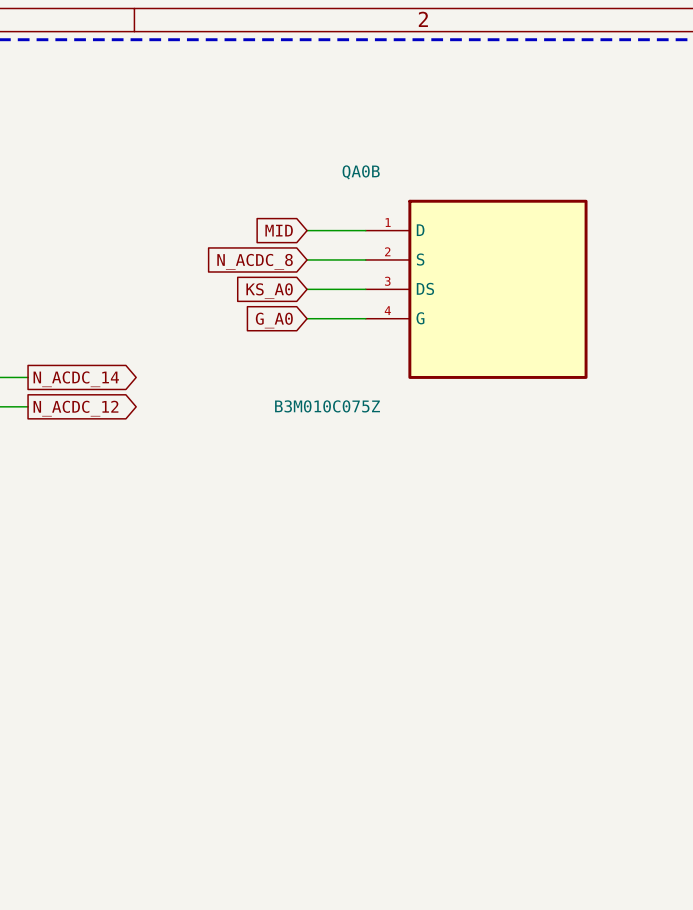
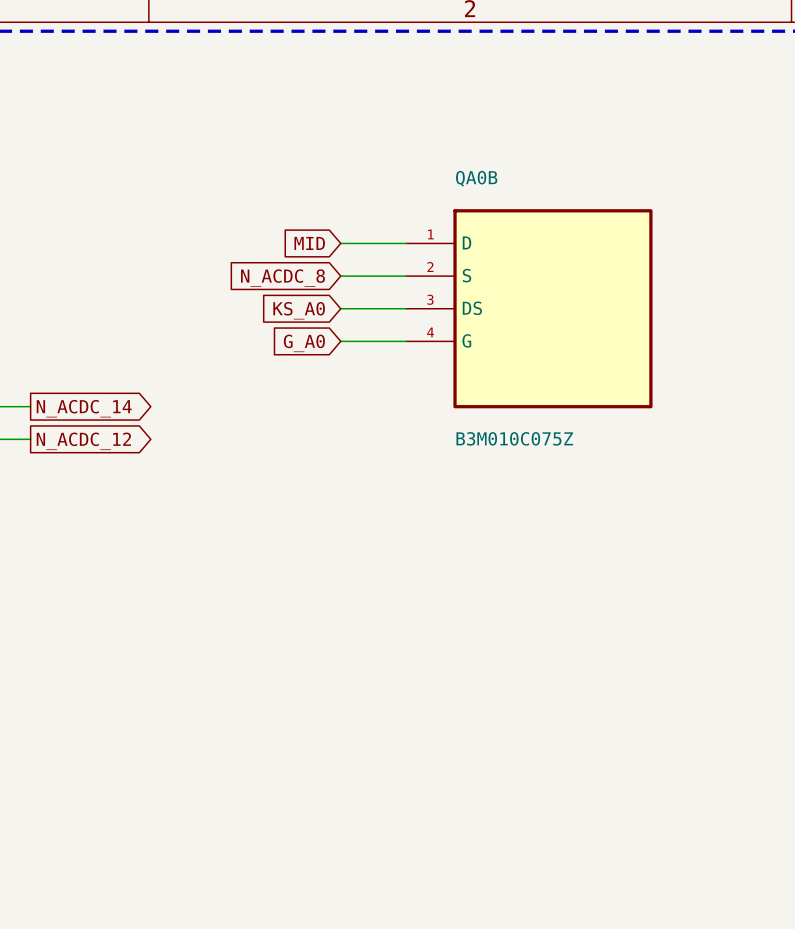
QA0B name position: QA0B (361, 172) -> QA0B (476, 178)
QA0B value position: B3M010C075Z (327, 406) -> B3M010C075Z (514, 438)

